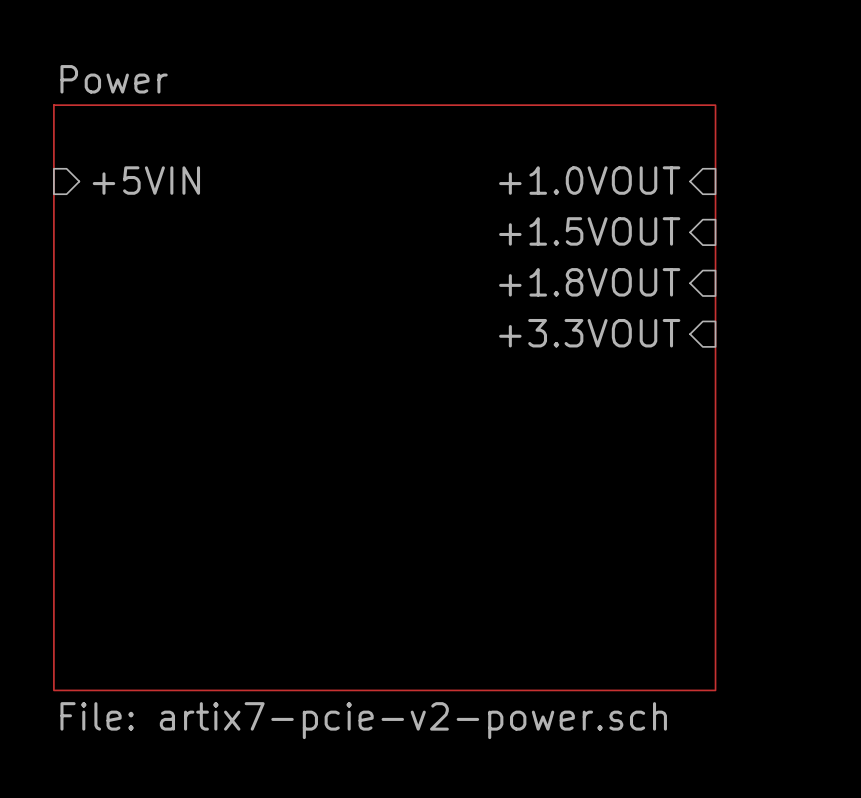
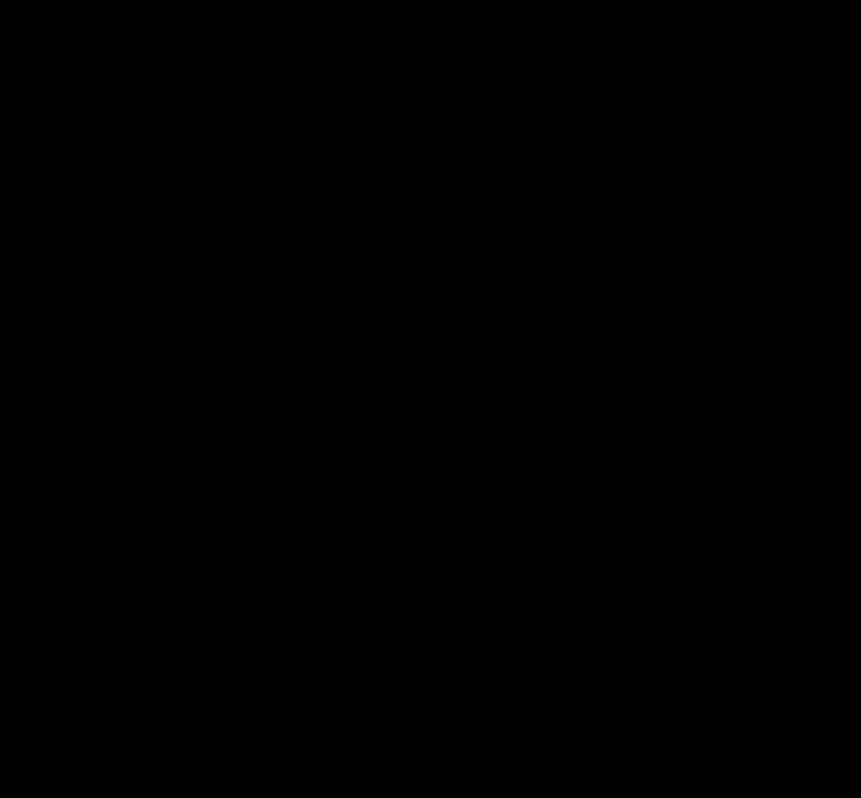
sheet pin: +5VIN (146, 180) -> none
sheet pin: +1.0VOUT (589, 180) -> none
sheet pin: +1.5VOUT (589, 231) -> none
sheet pin: +1.8VOUT (589, 282) -> none
sheet pin: +3.3VOUT (589, 333) -> none
sheet Power: File: artix7-pcie-v2-power.sch (384, 397) -> none

